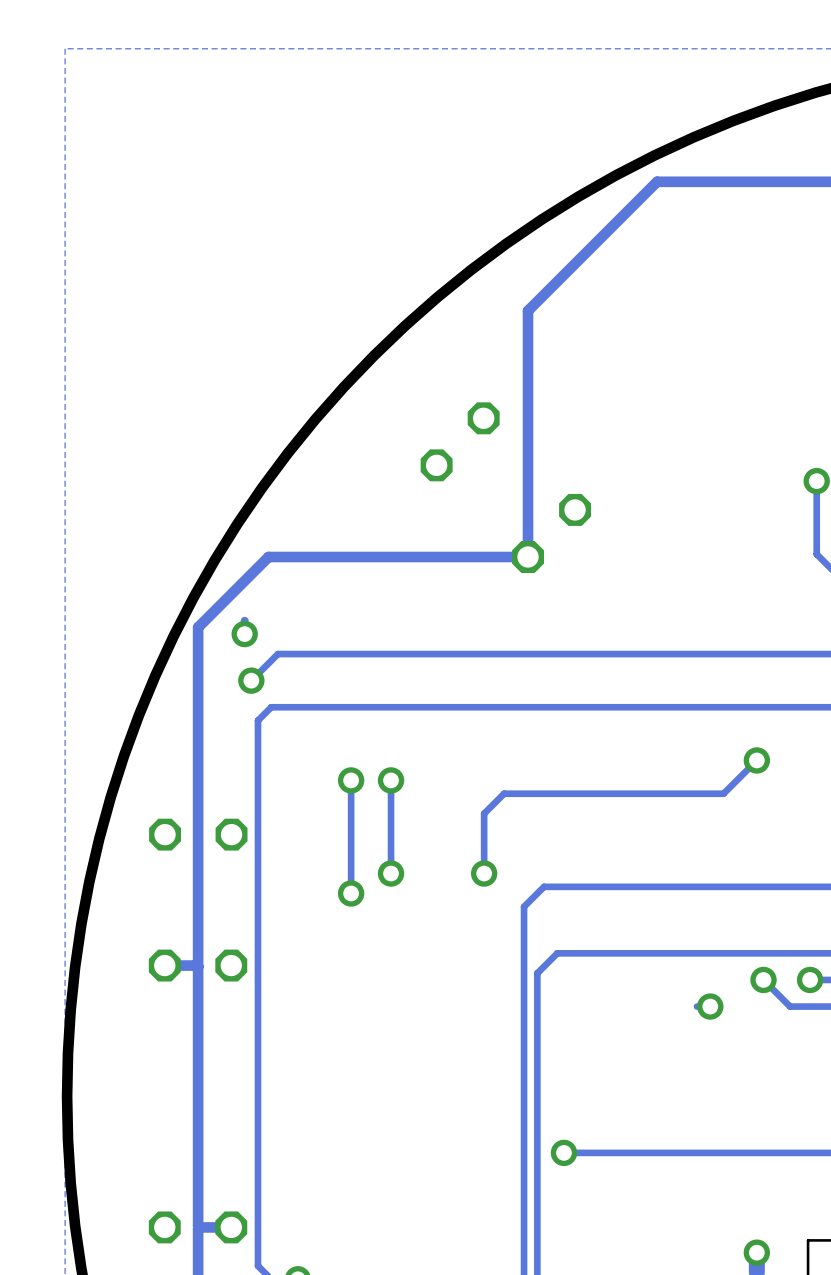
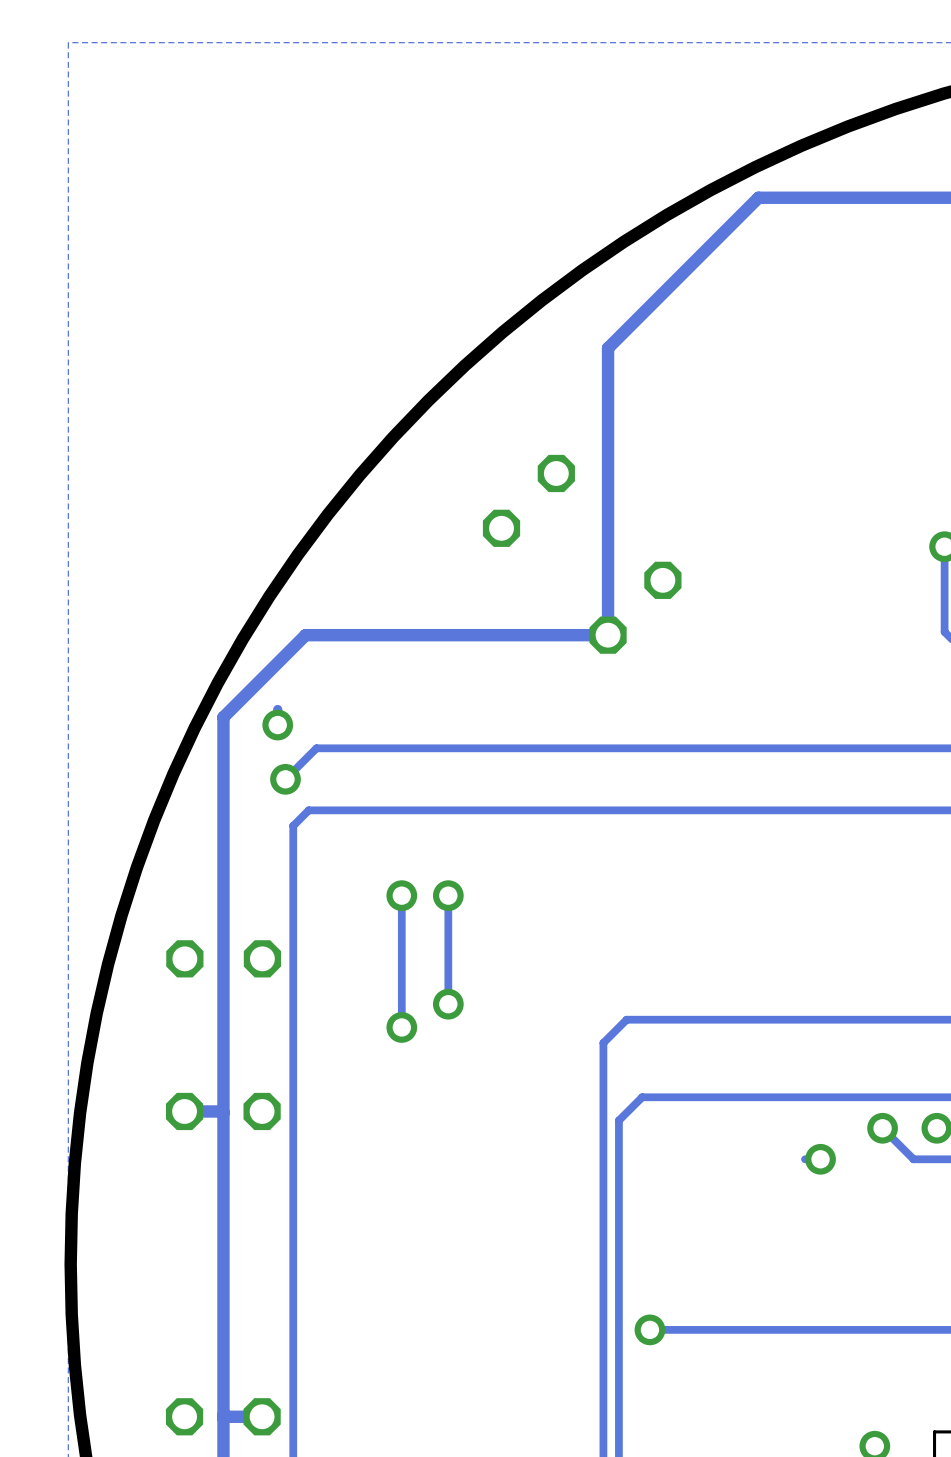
track: (756, 760) (723, 793) (504, 793) (484, 813) (484, 873) -> none
via: (756, 760) -> none
via: (484, 873) -> none

